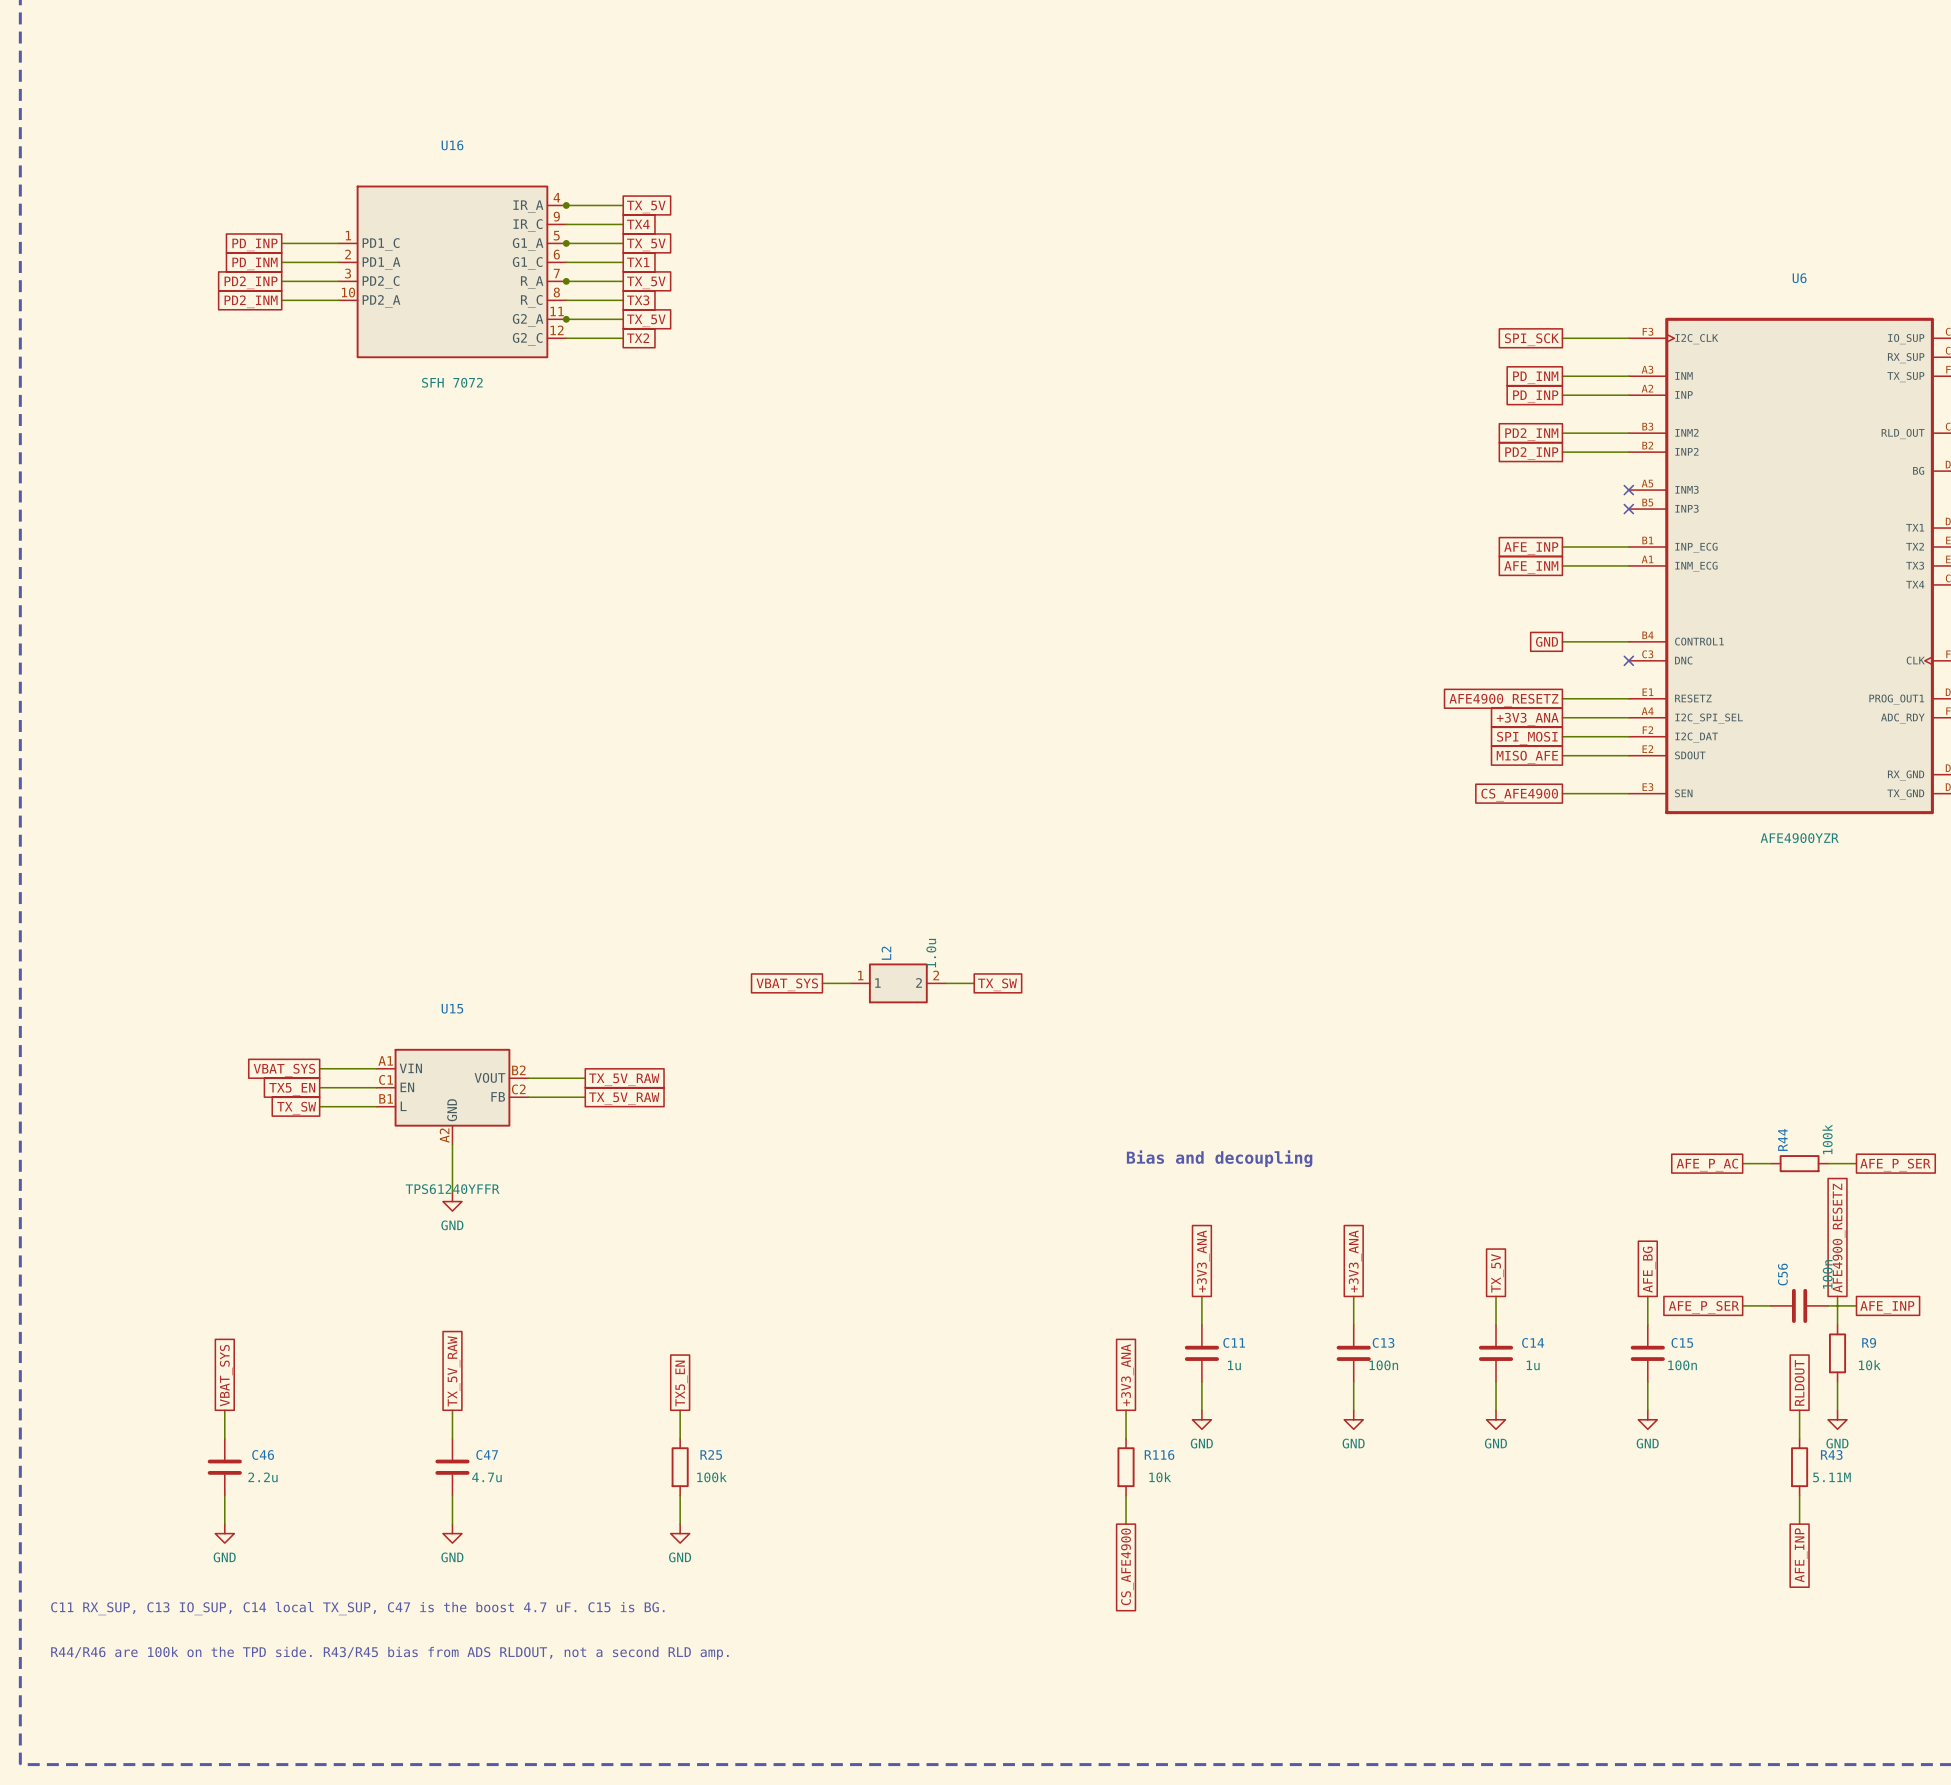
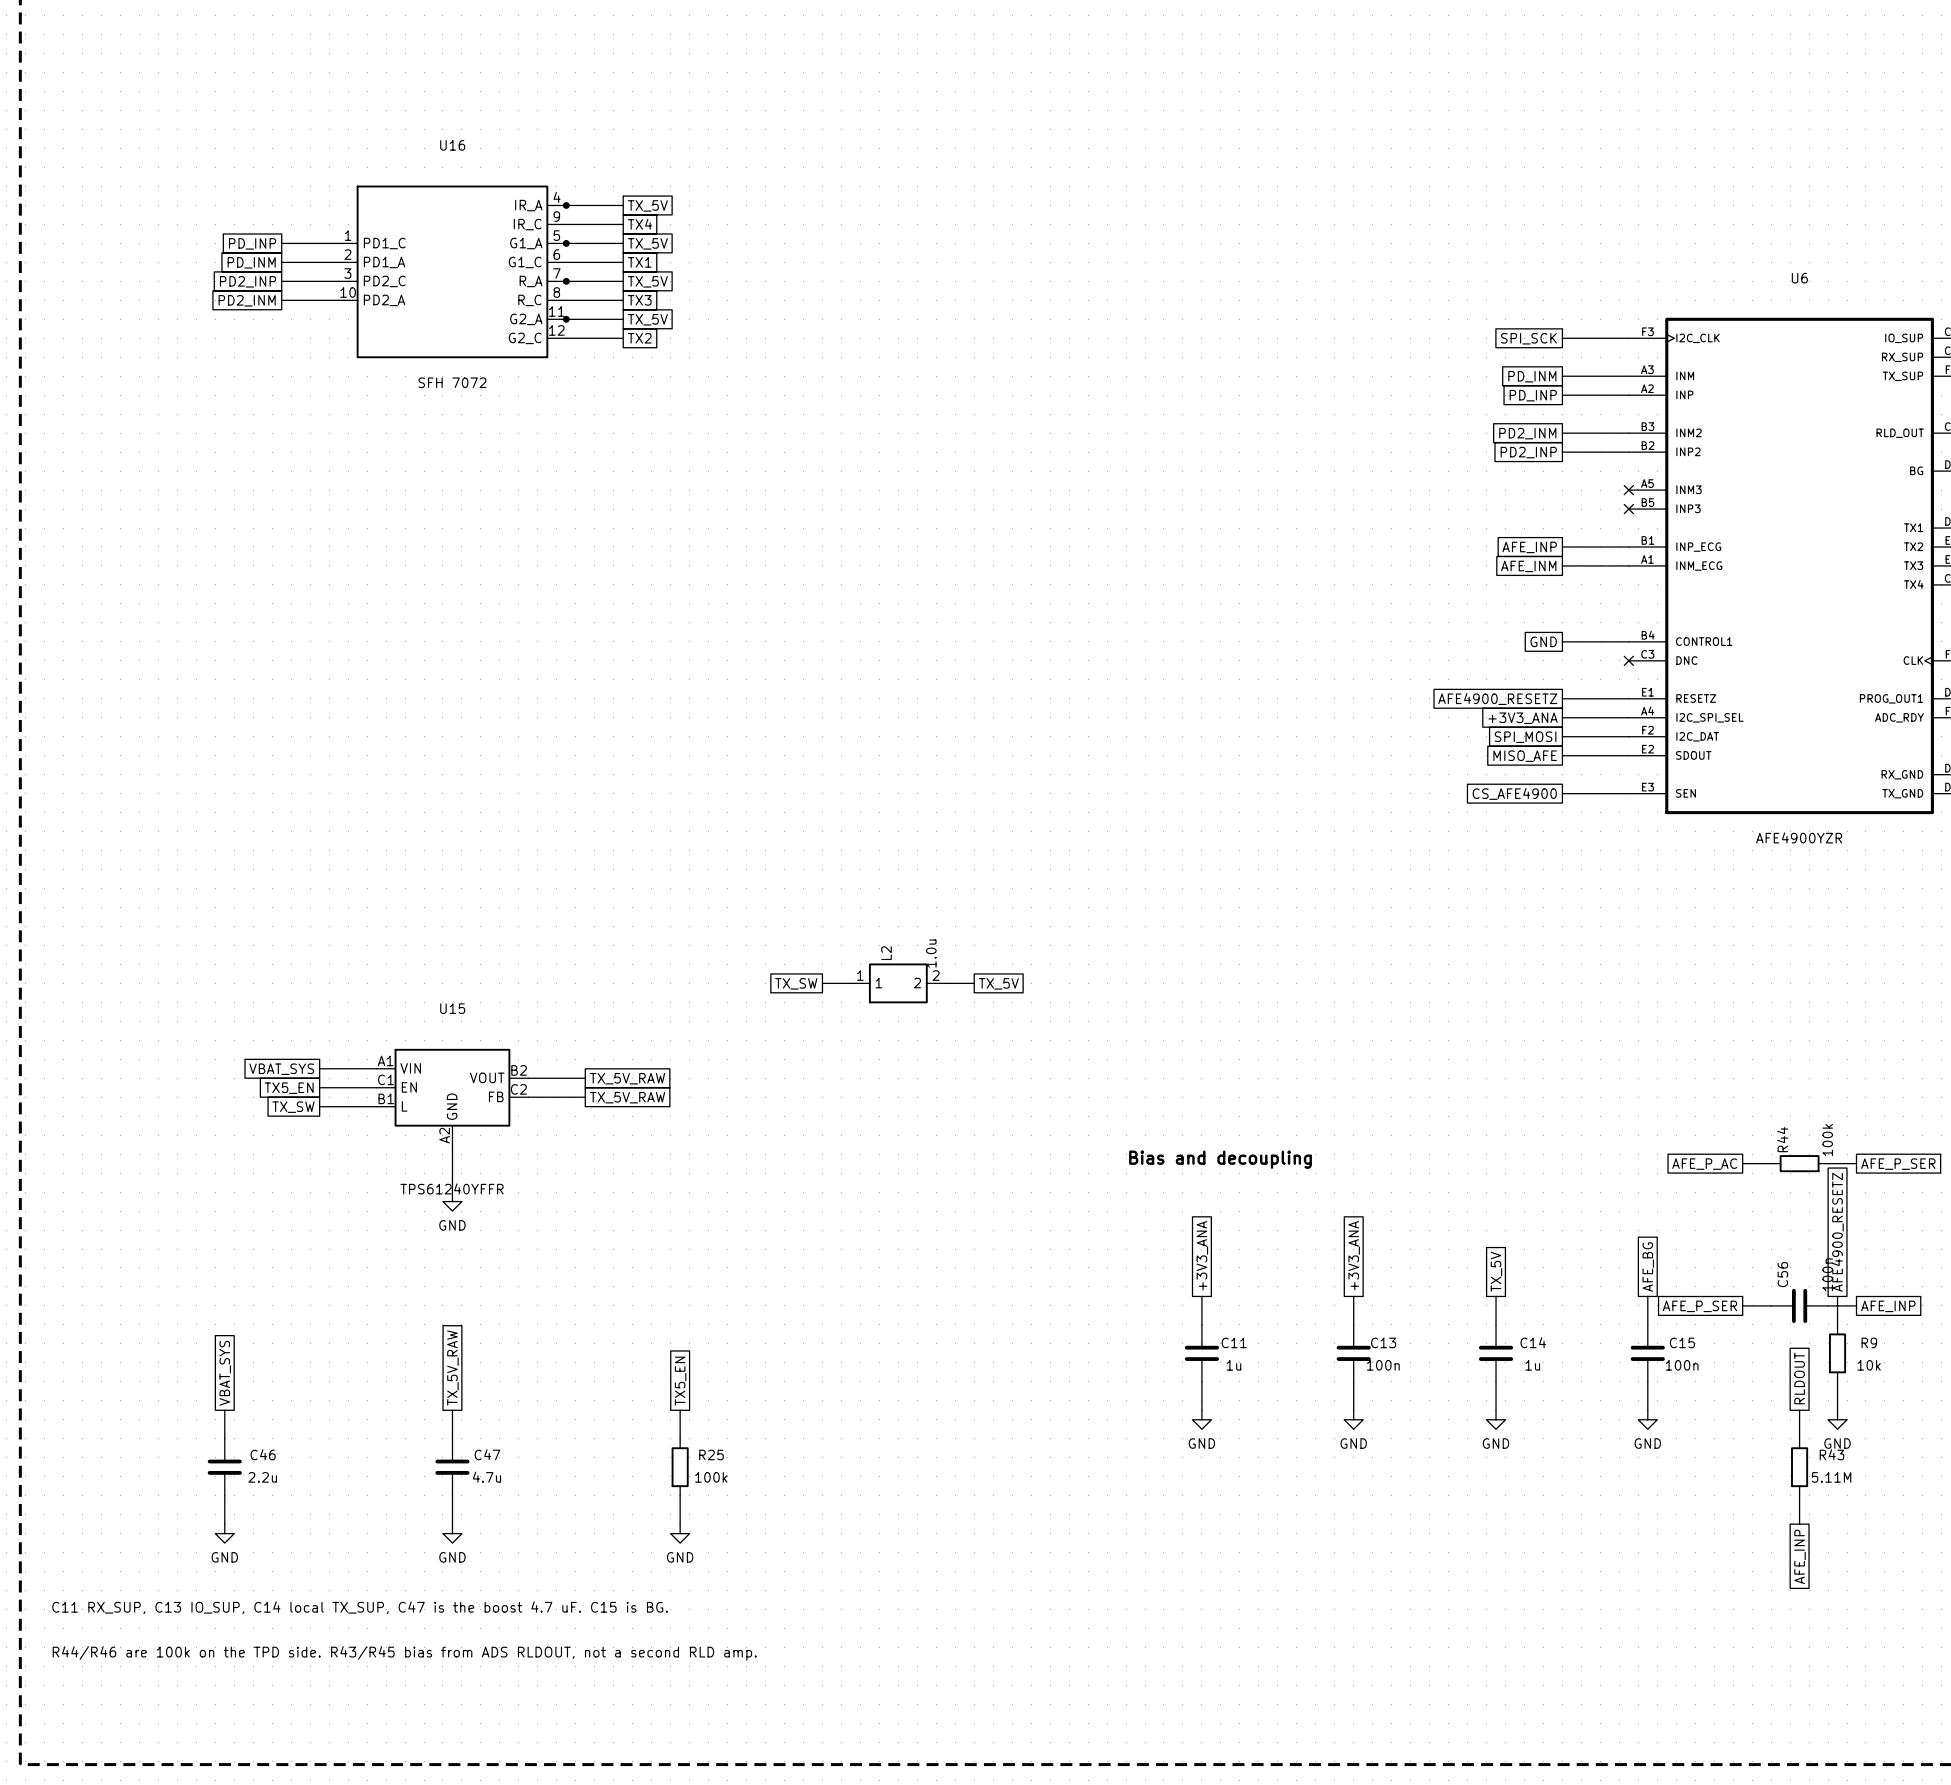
global label: VBAT_SYS (787, 984) -> TX_SW (796, 983)
global label: TX_SW (997, 984) -> TX_5V (998, 983)
global label: +3V3_ANA (1127, 1375) -> none
wire: (1126, 1410) (1126, 1438) -> none
R116: 10k (1126, 1467) -> none
wire: (1126, 1495) (1126, 1524) -> none
global label: CS_AFE4900 (1127, 1566) -> none

